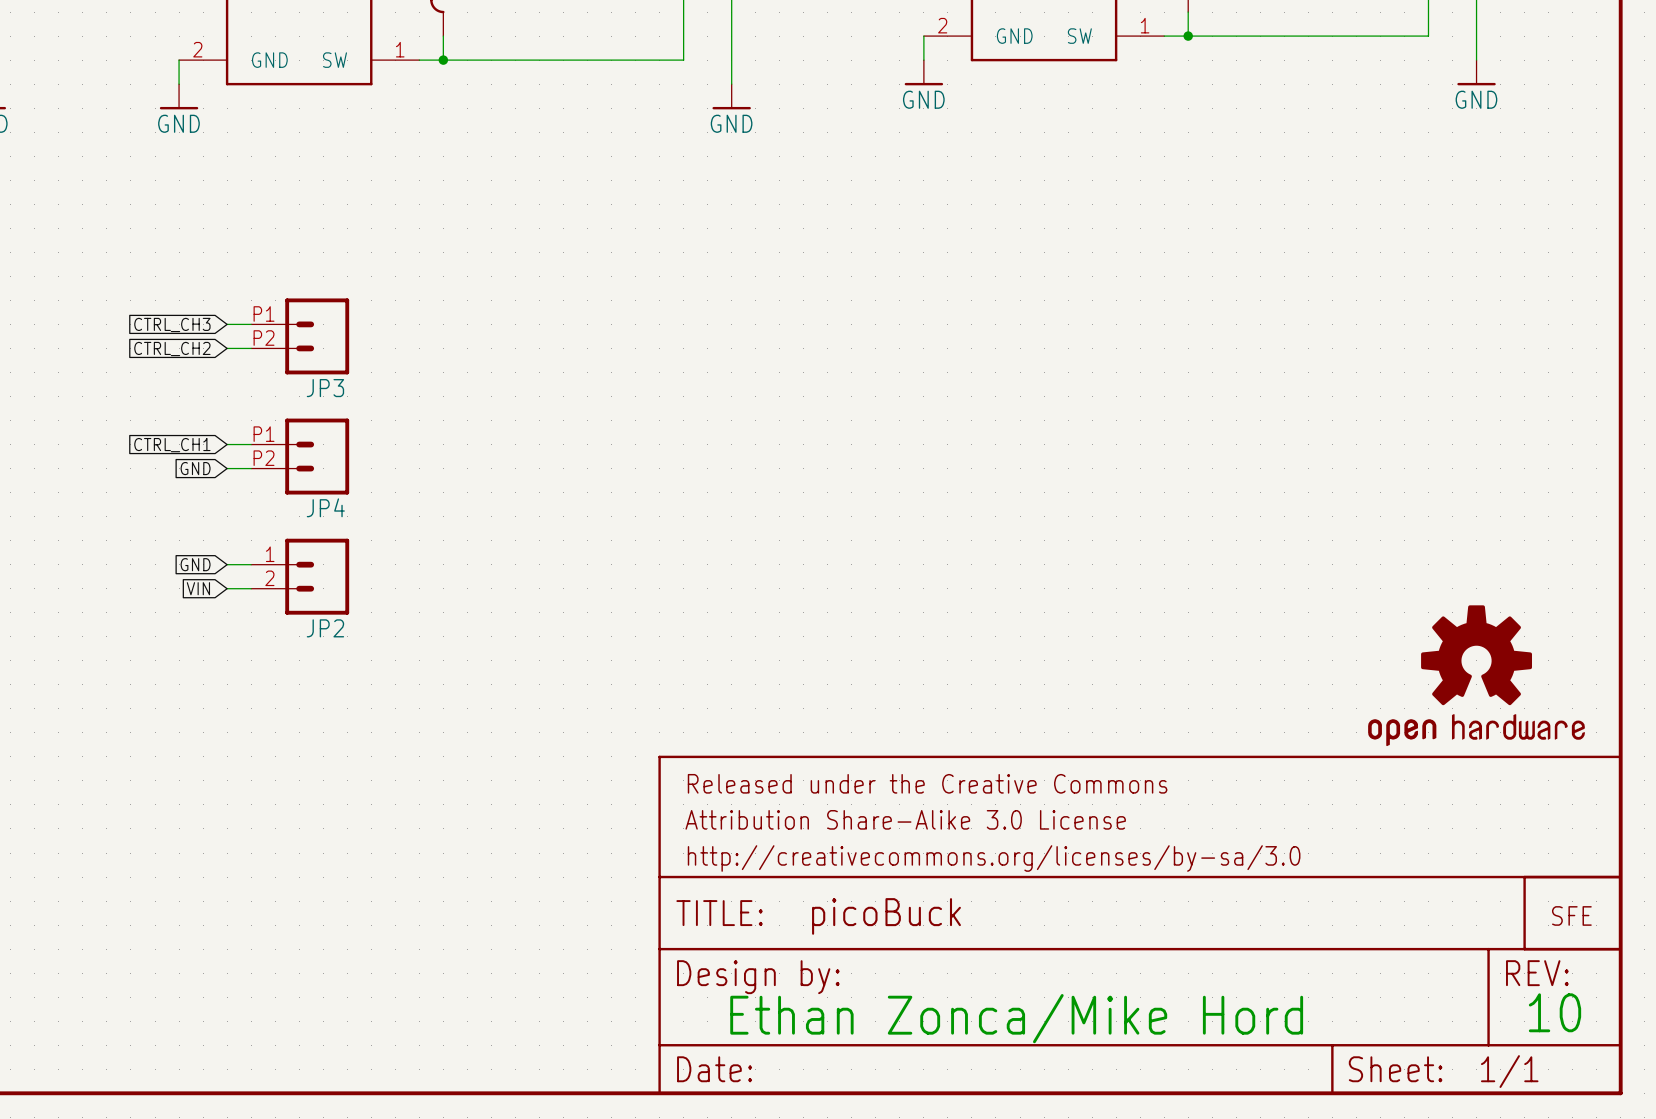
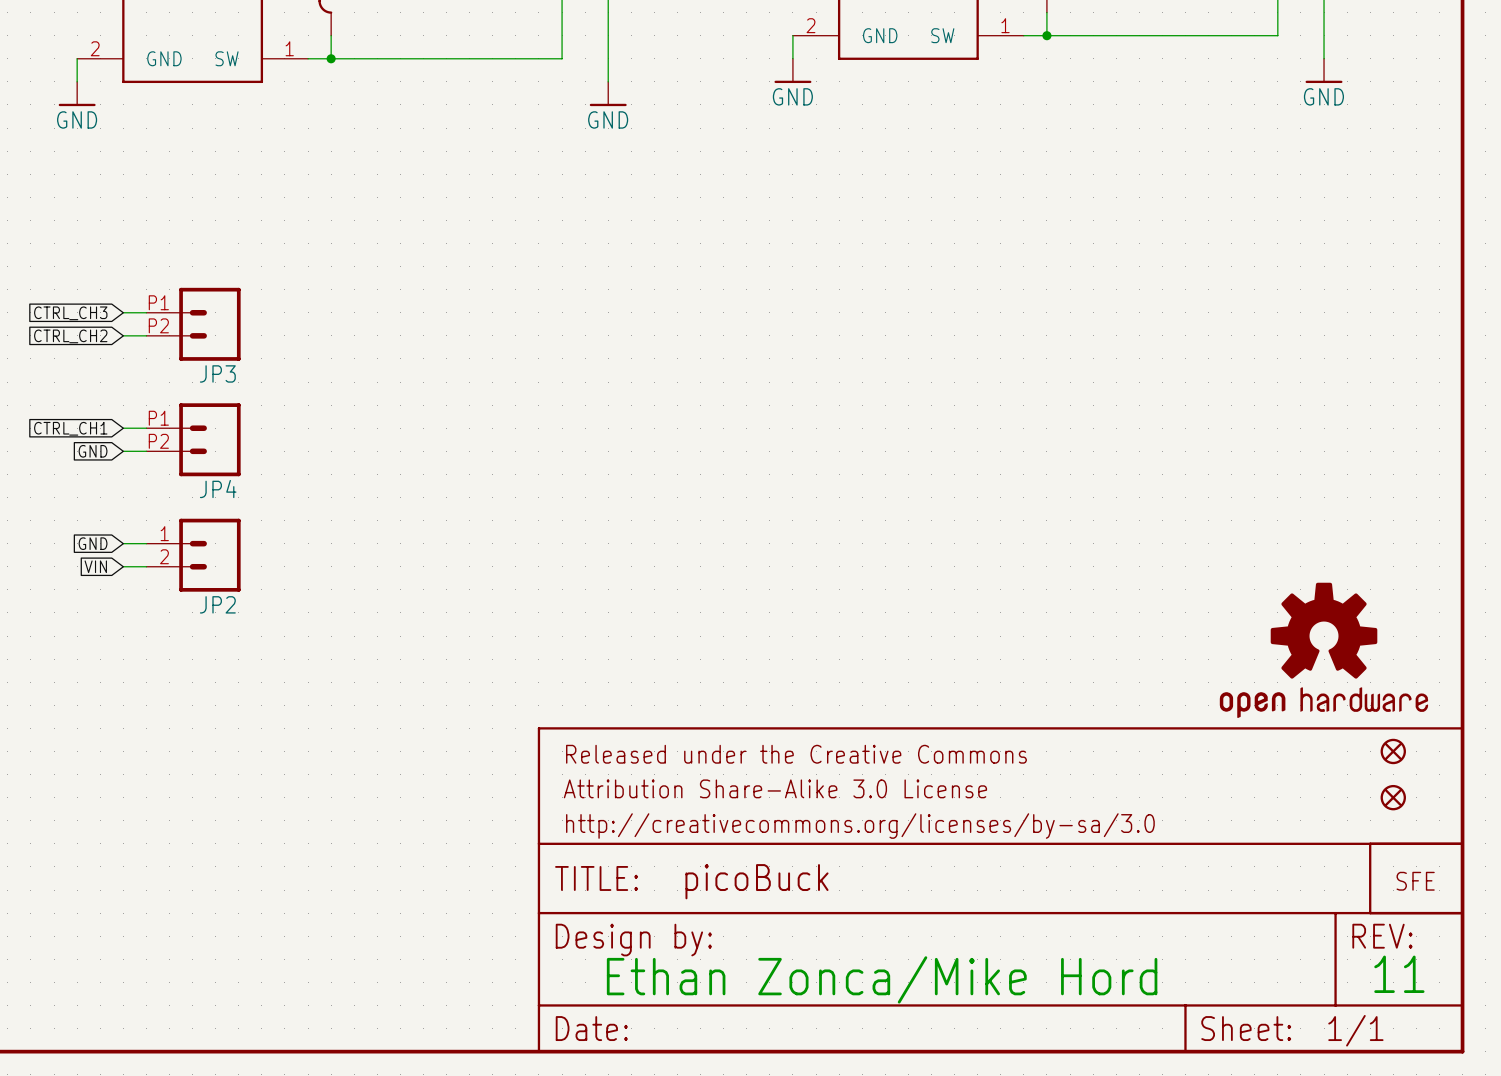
part: none -> (1393, 751)
part: none -> (1393, 797)
text: 10 (1554, 1012) -> 11 (1399, 974)

